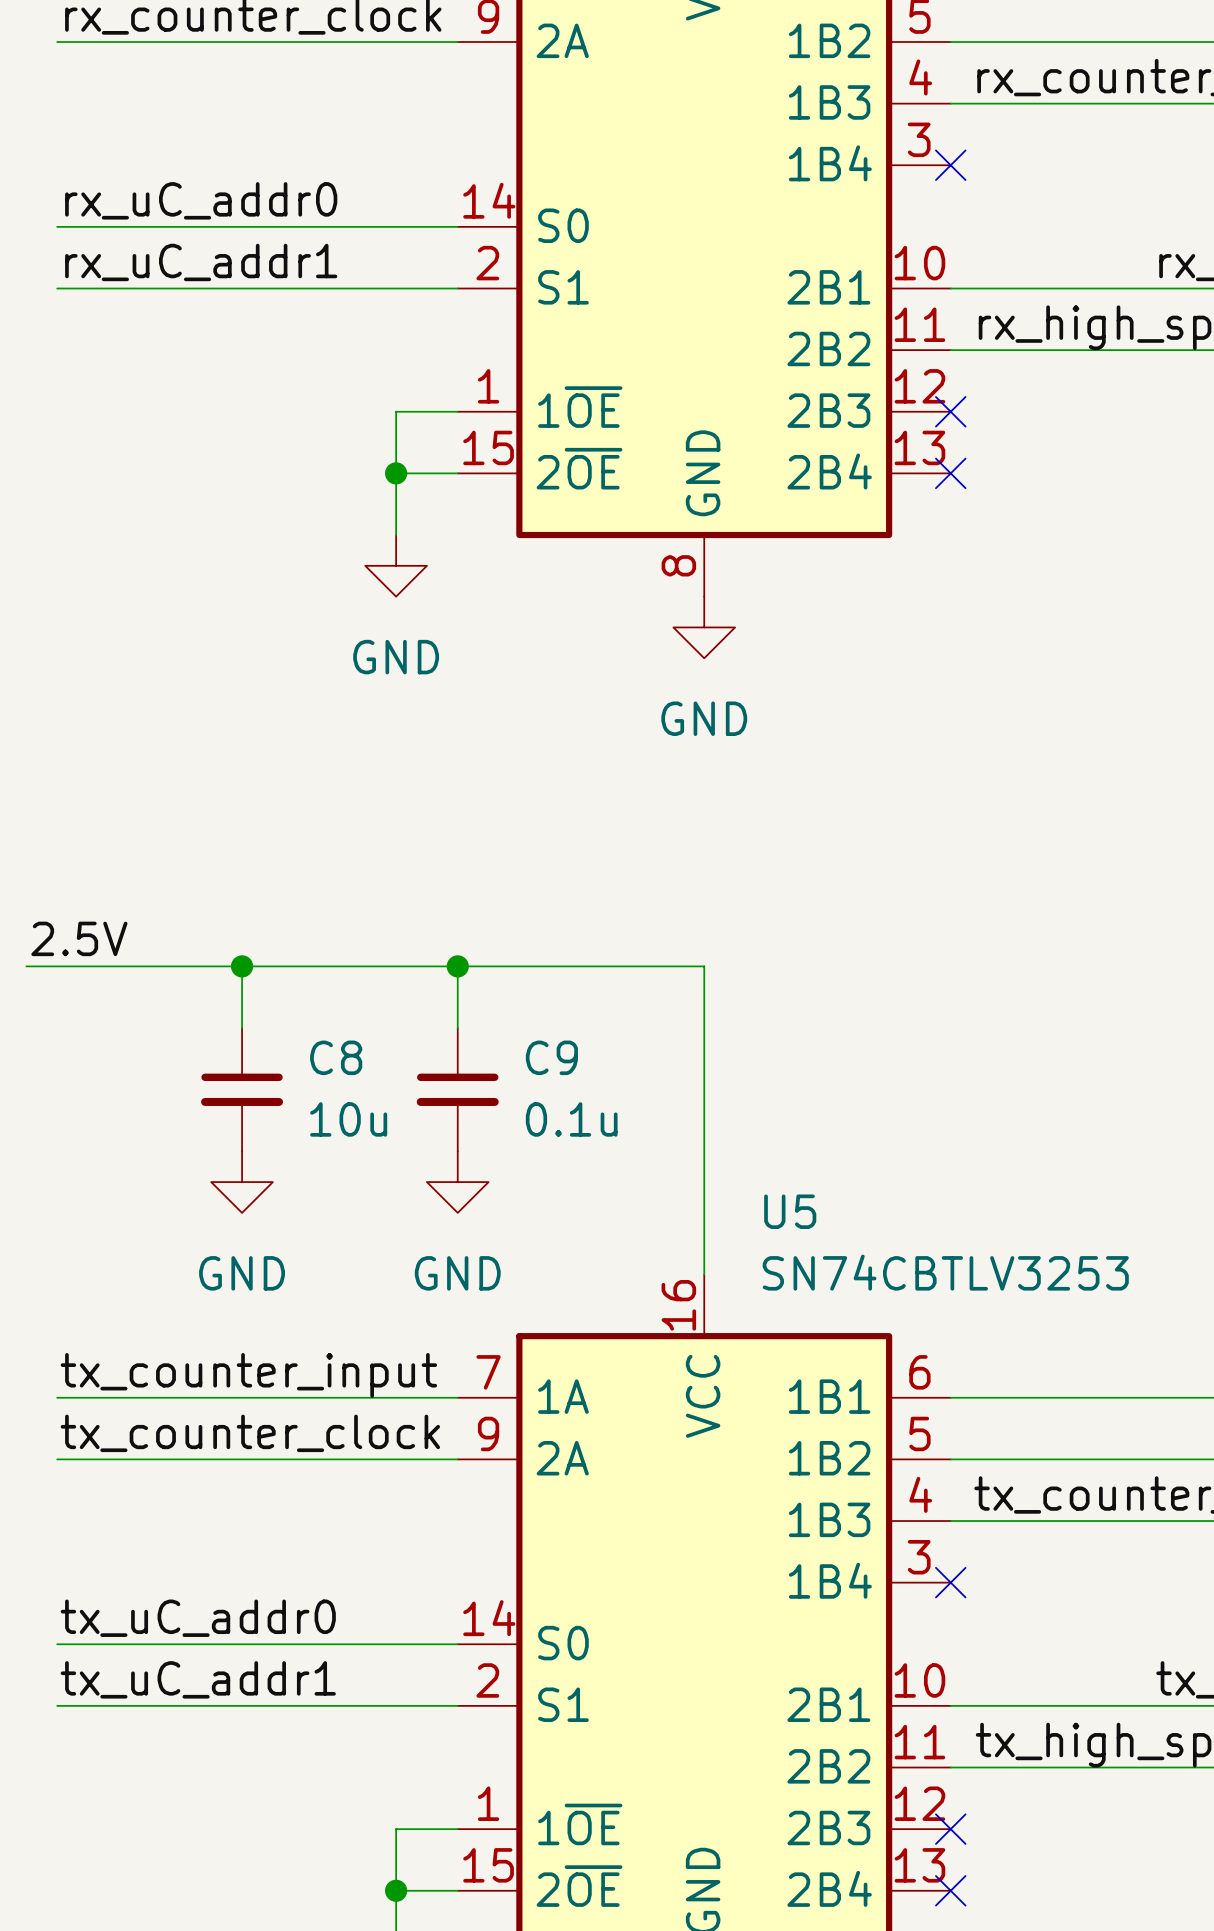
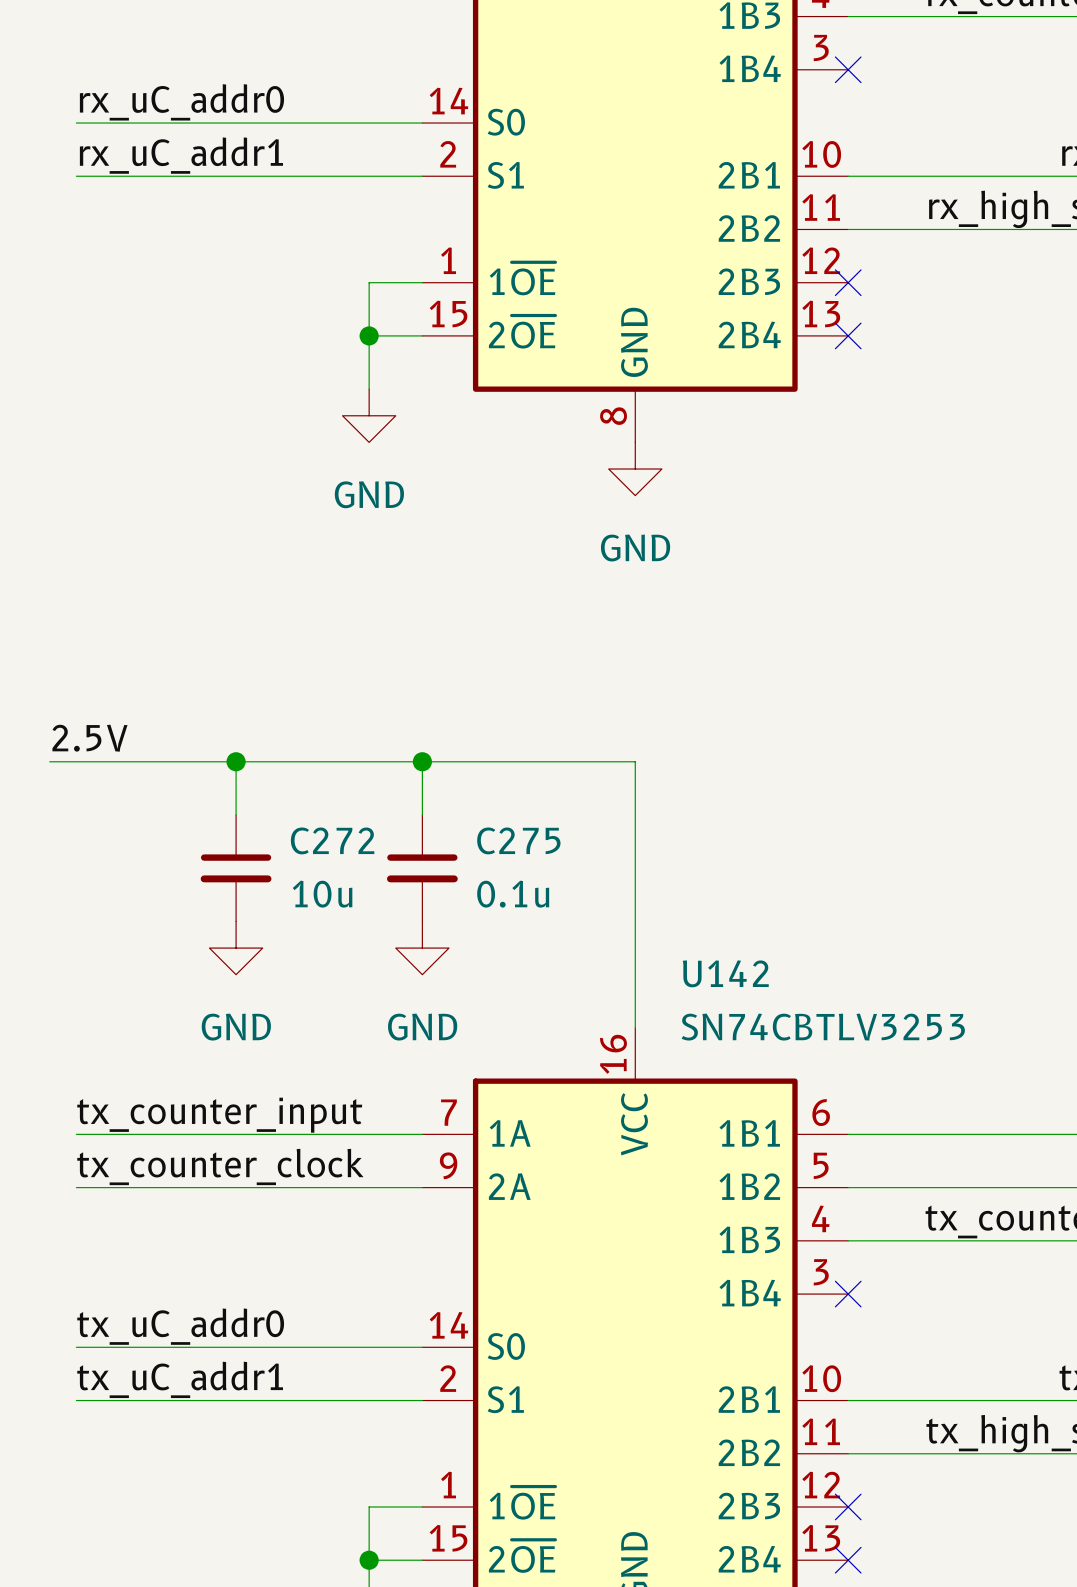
C8 name: C8 (336, 1057) -> C272 (332, 840)
C9 name: C9 (551, 1057) -> C275 (518, 840)
U5 name: U5 (790, 1211) -> U142 (725, 973)

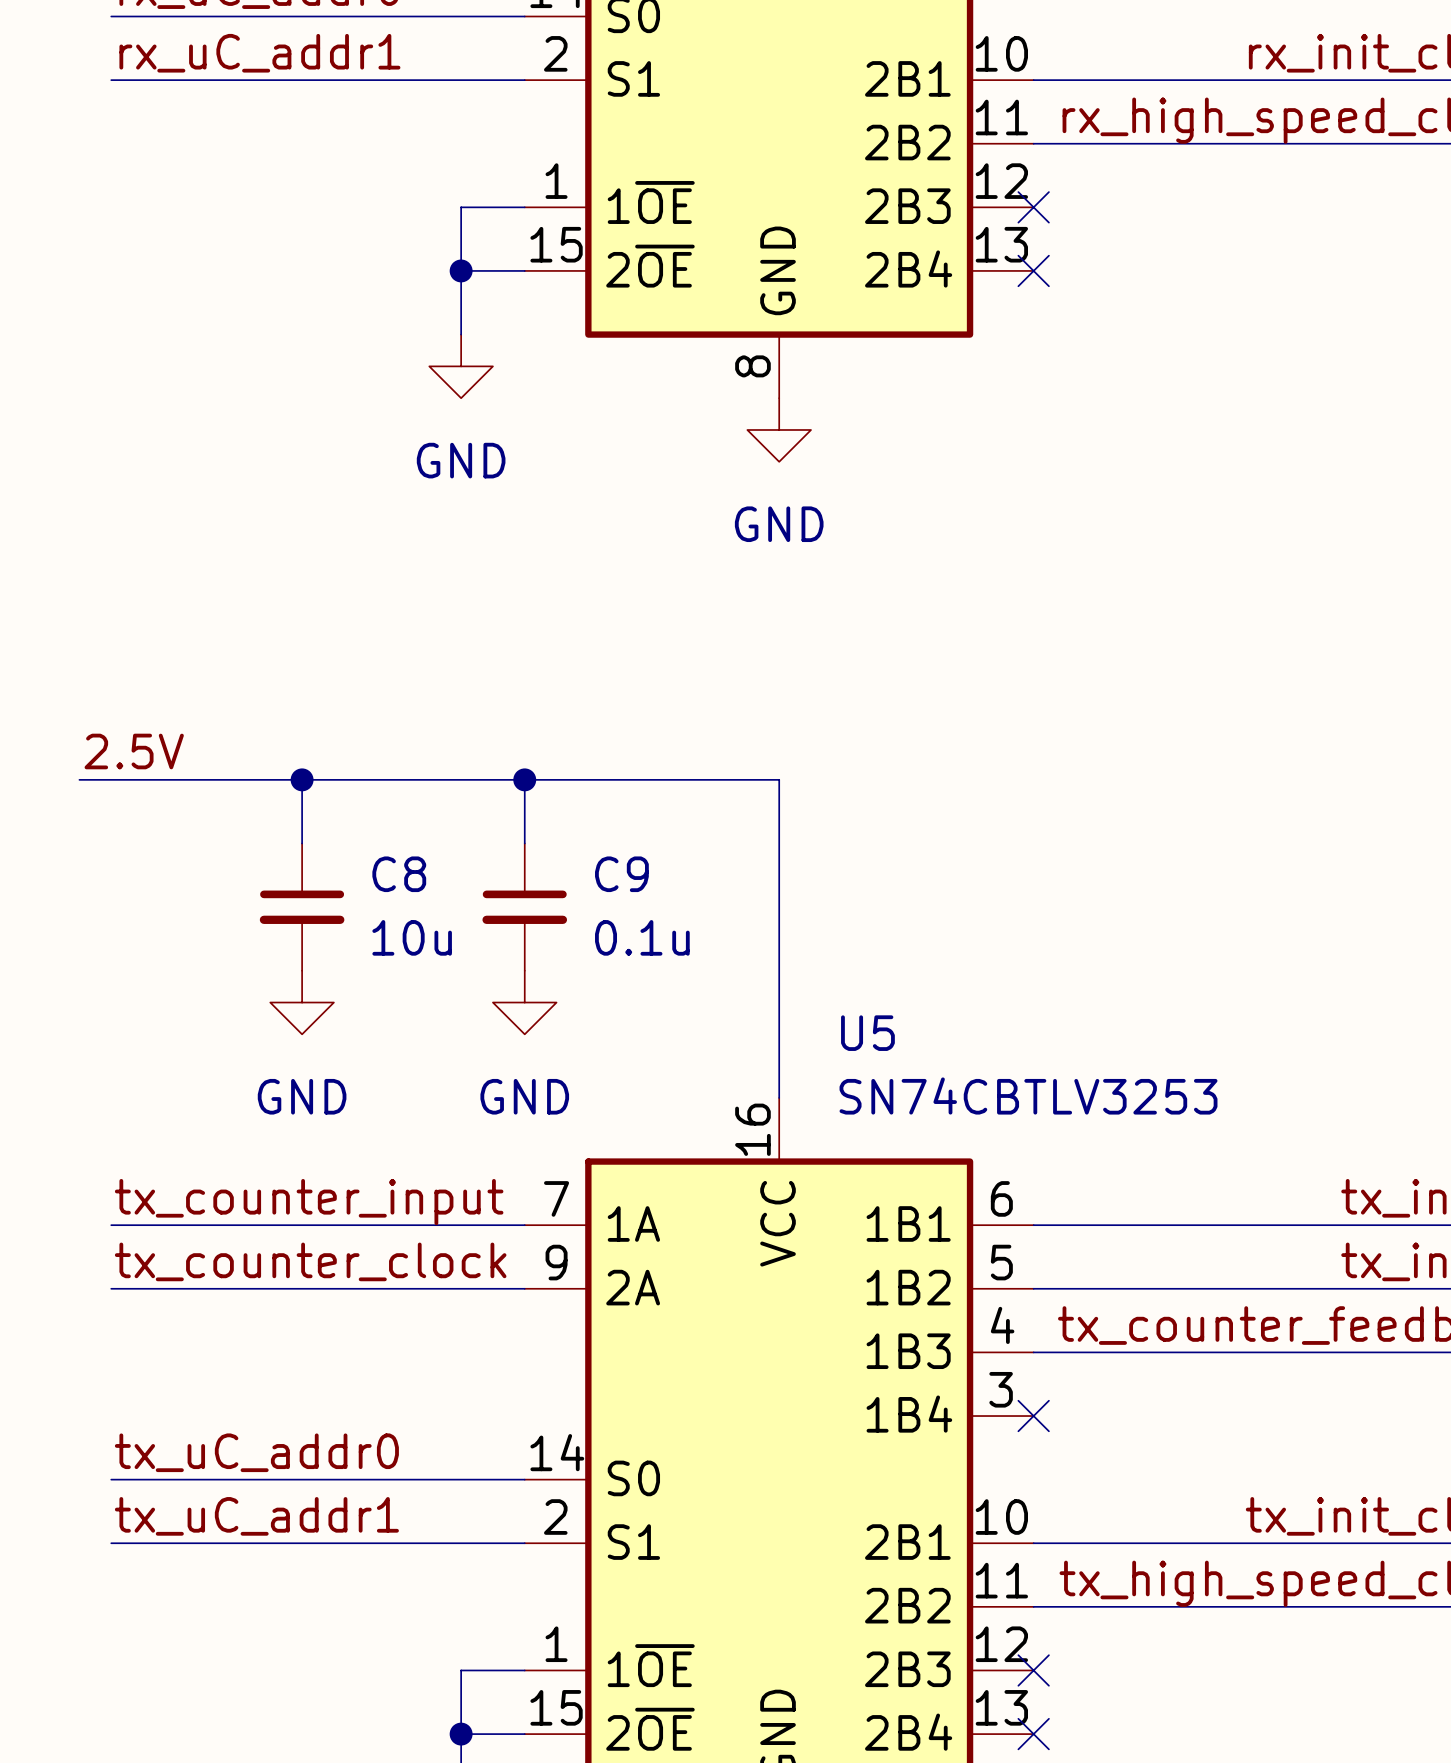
C272 name: C272 (332, 840) -> C8 (399, 874)
C275 name: C275 (518, 840) -> C9 (621, 874)
U142 name: U142 (725, 973) -> U5 (867, 1033)

